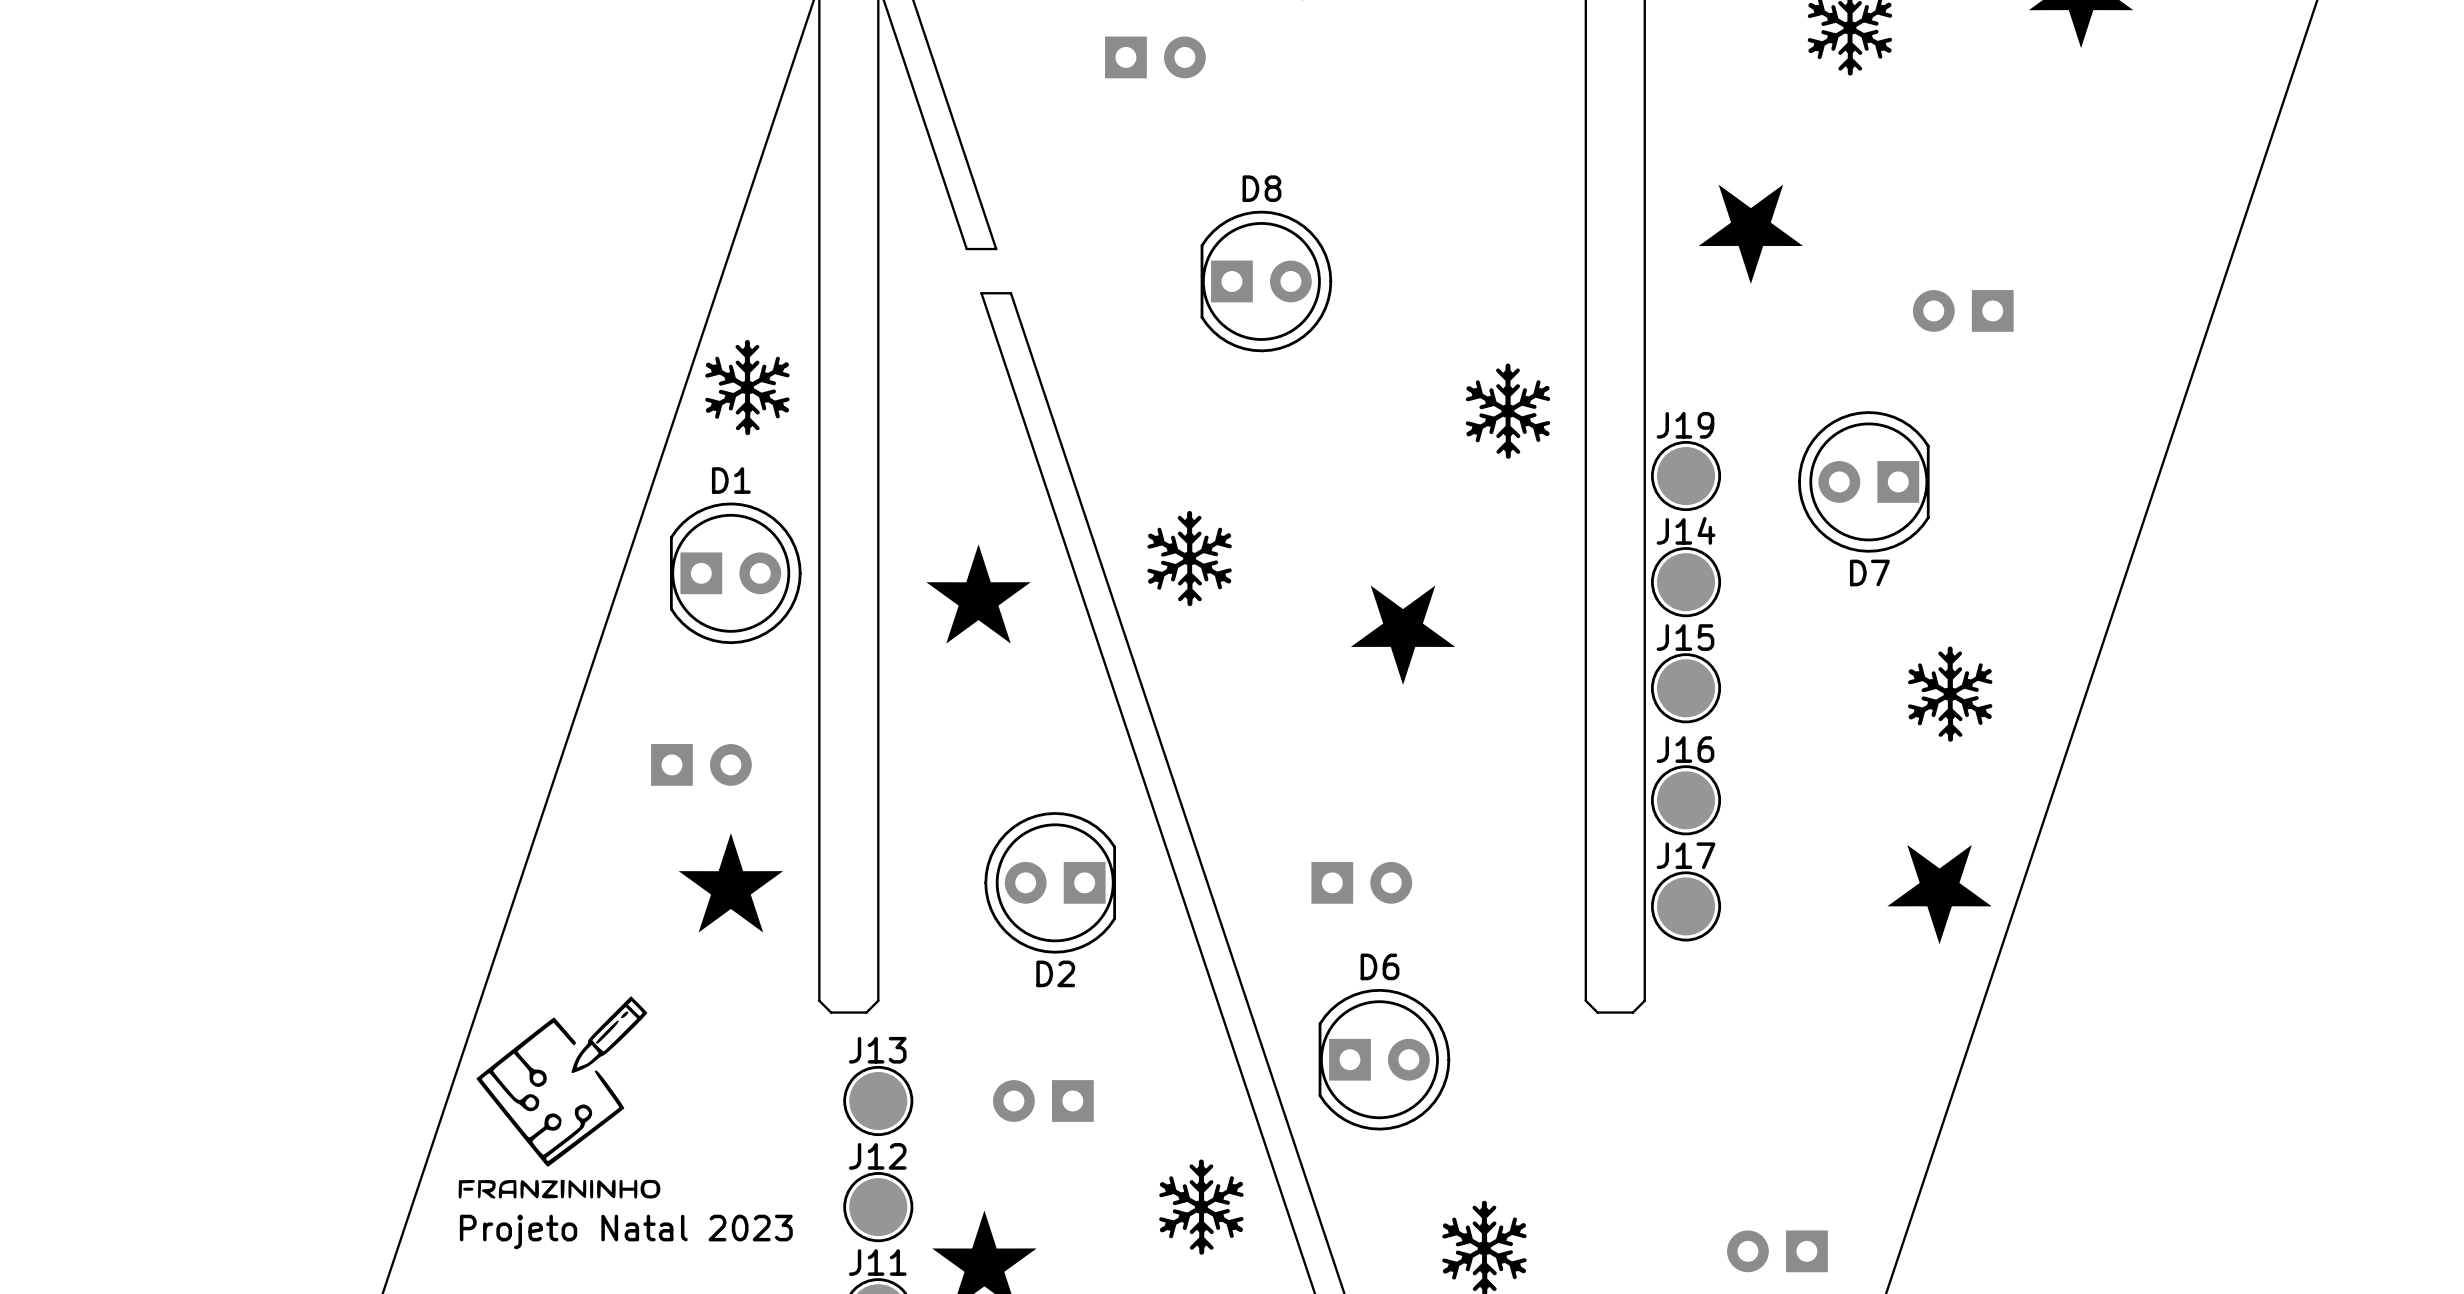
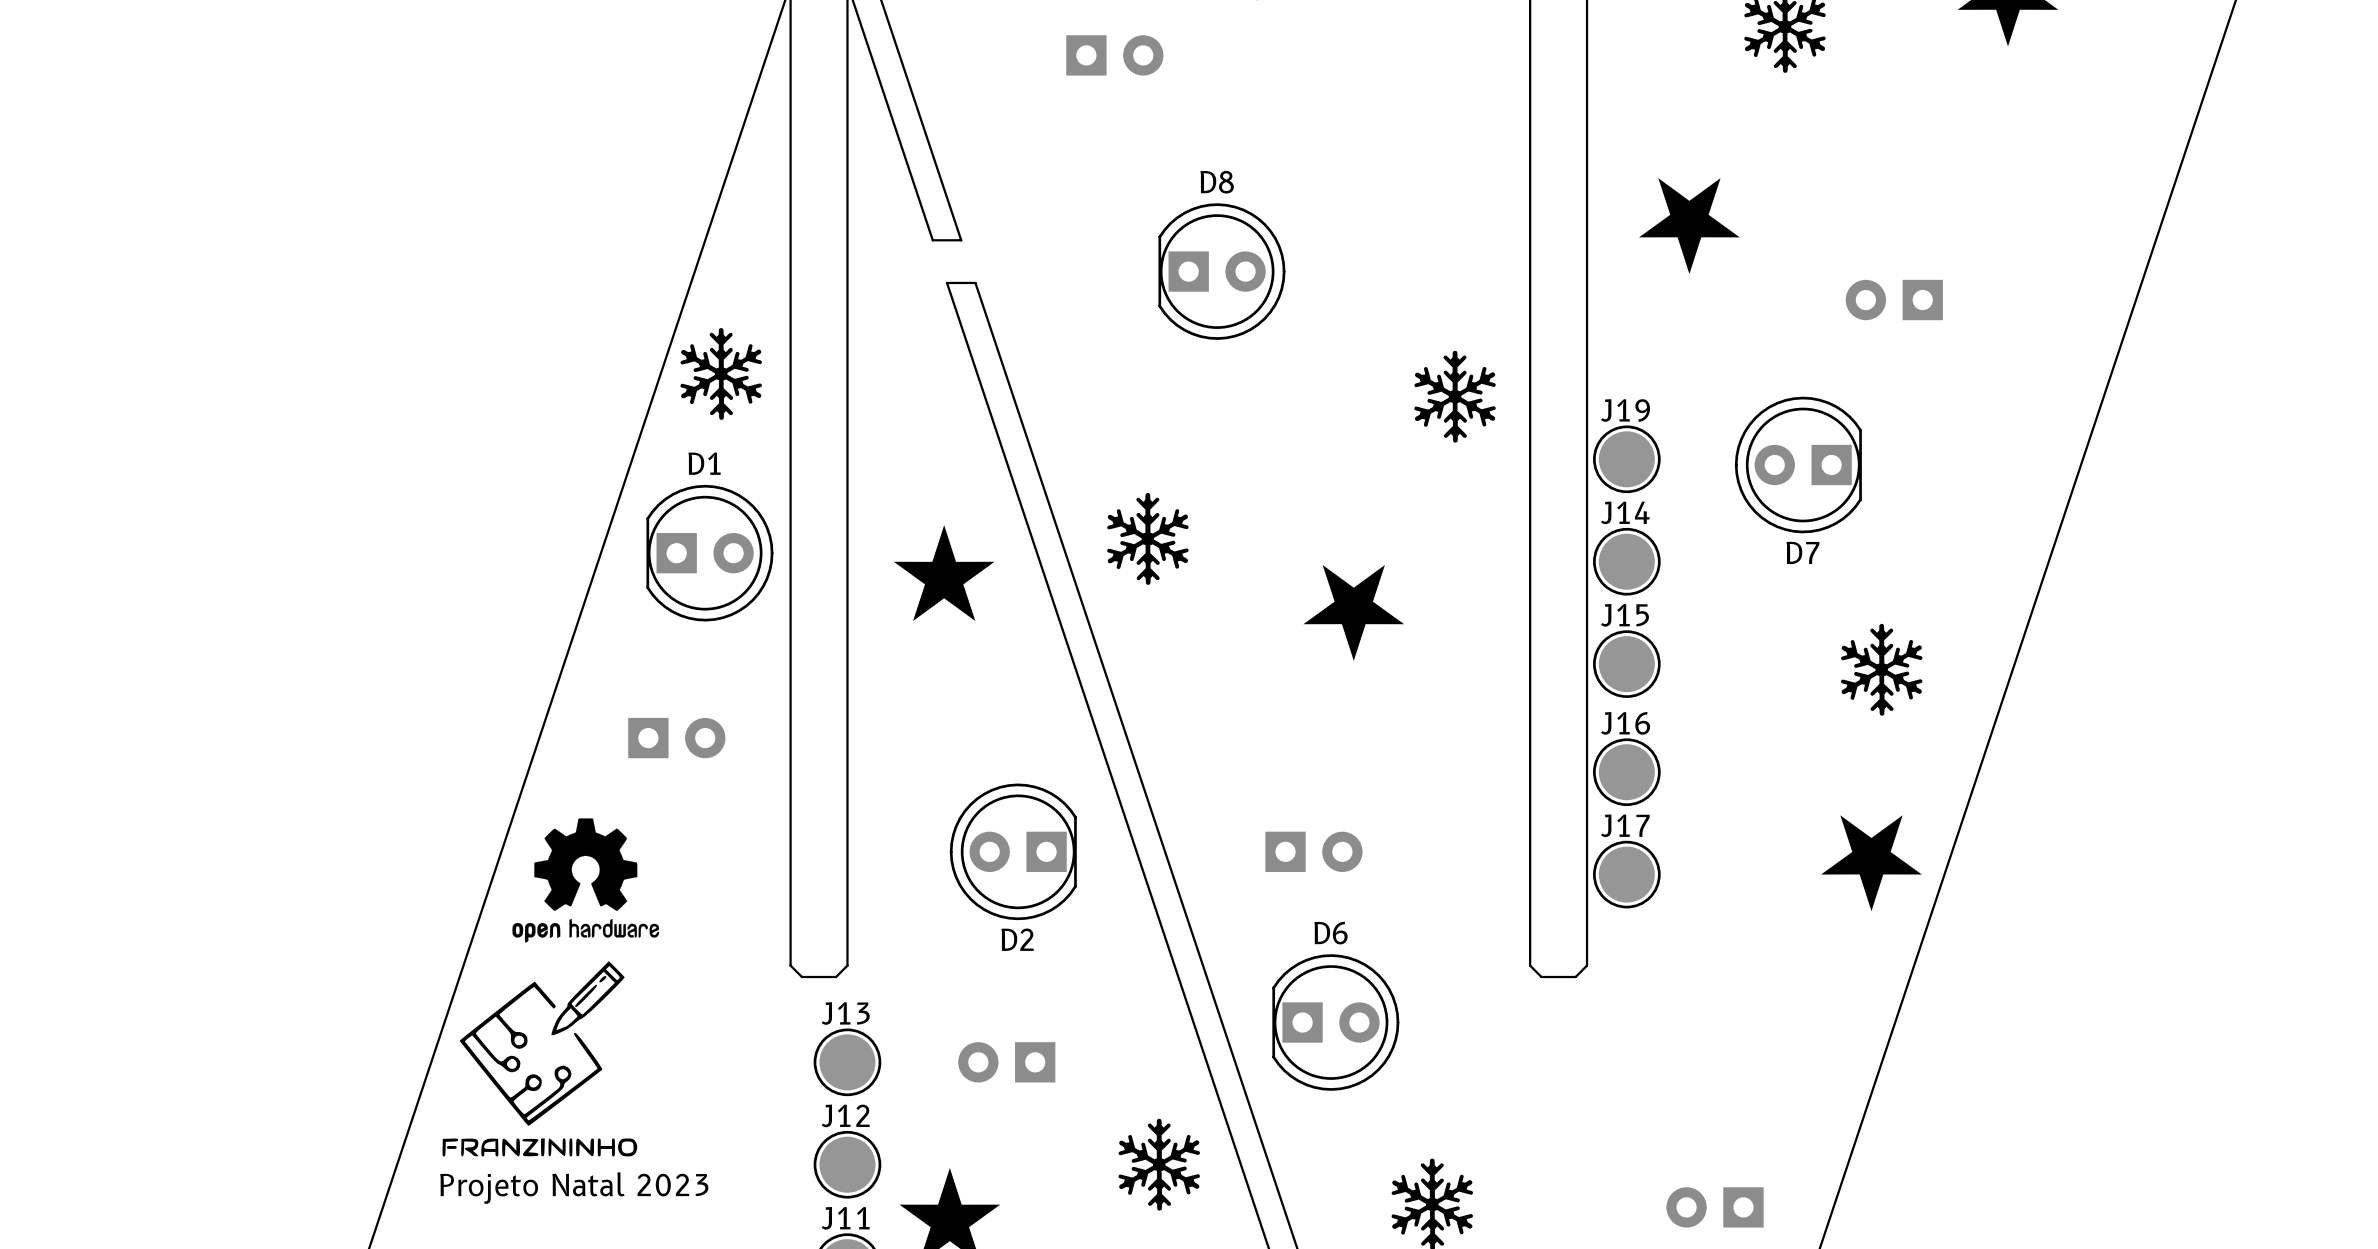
drawing: [678, 833, 784, 933] -> none
drawing: none -> [512, 818, 660, 943]

